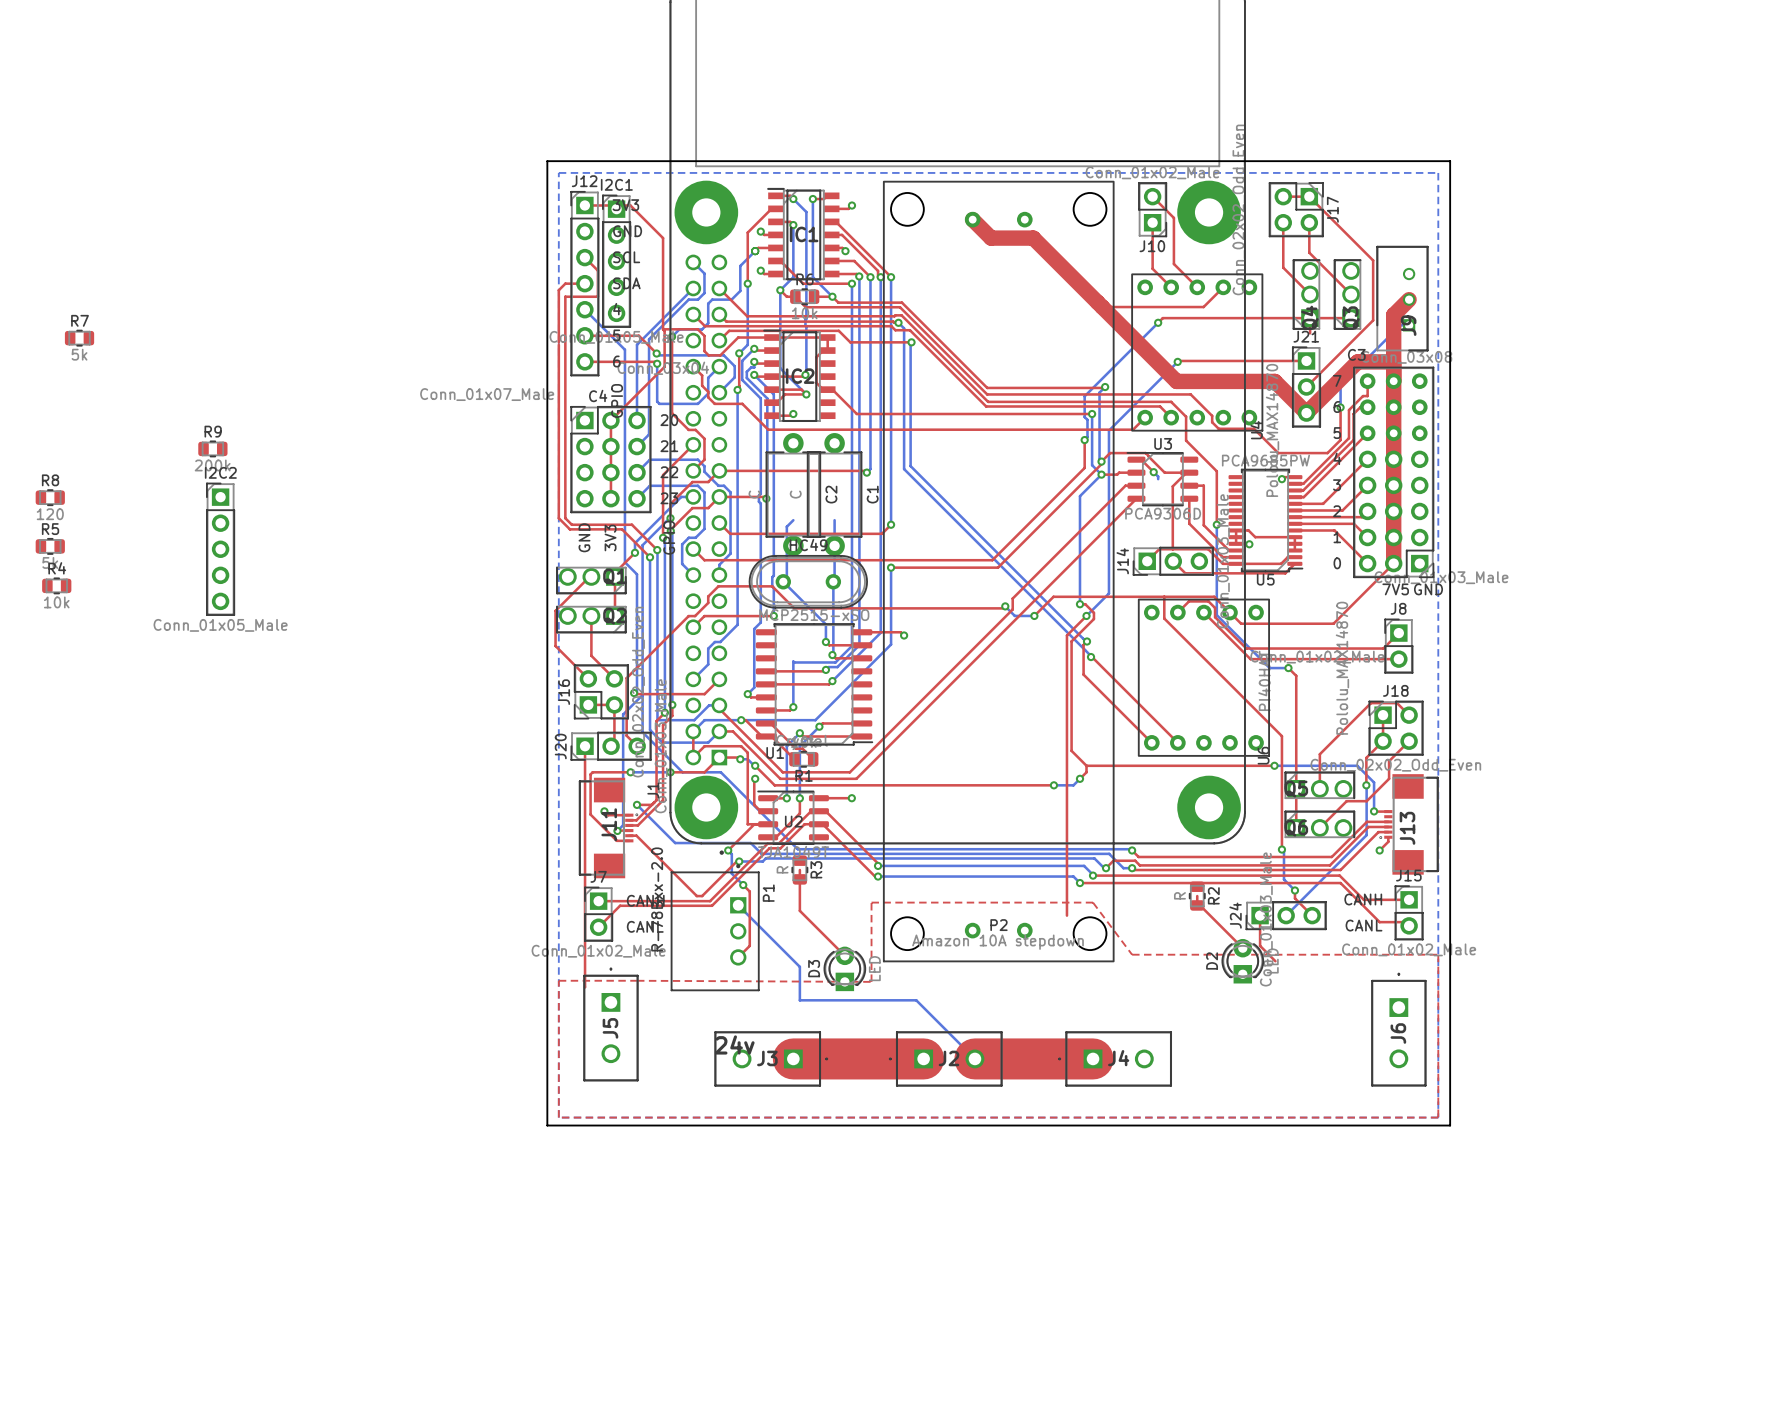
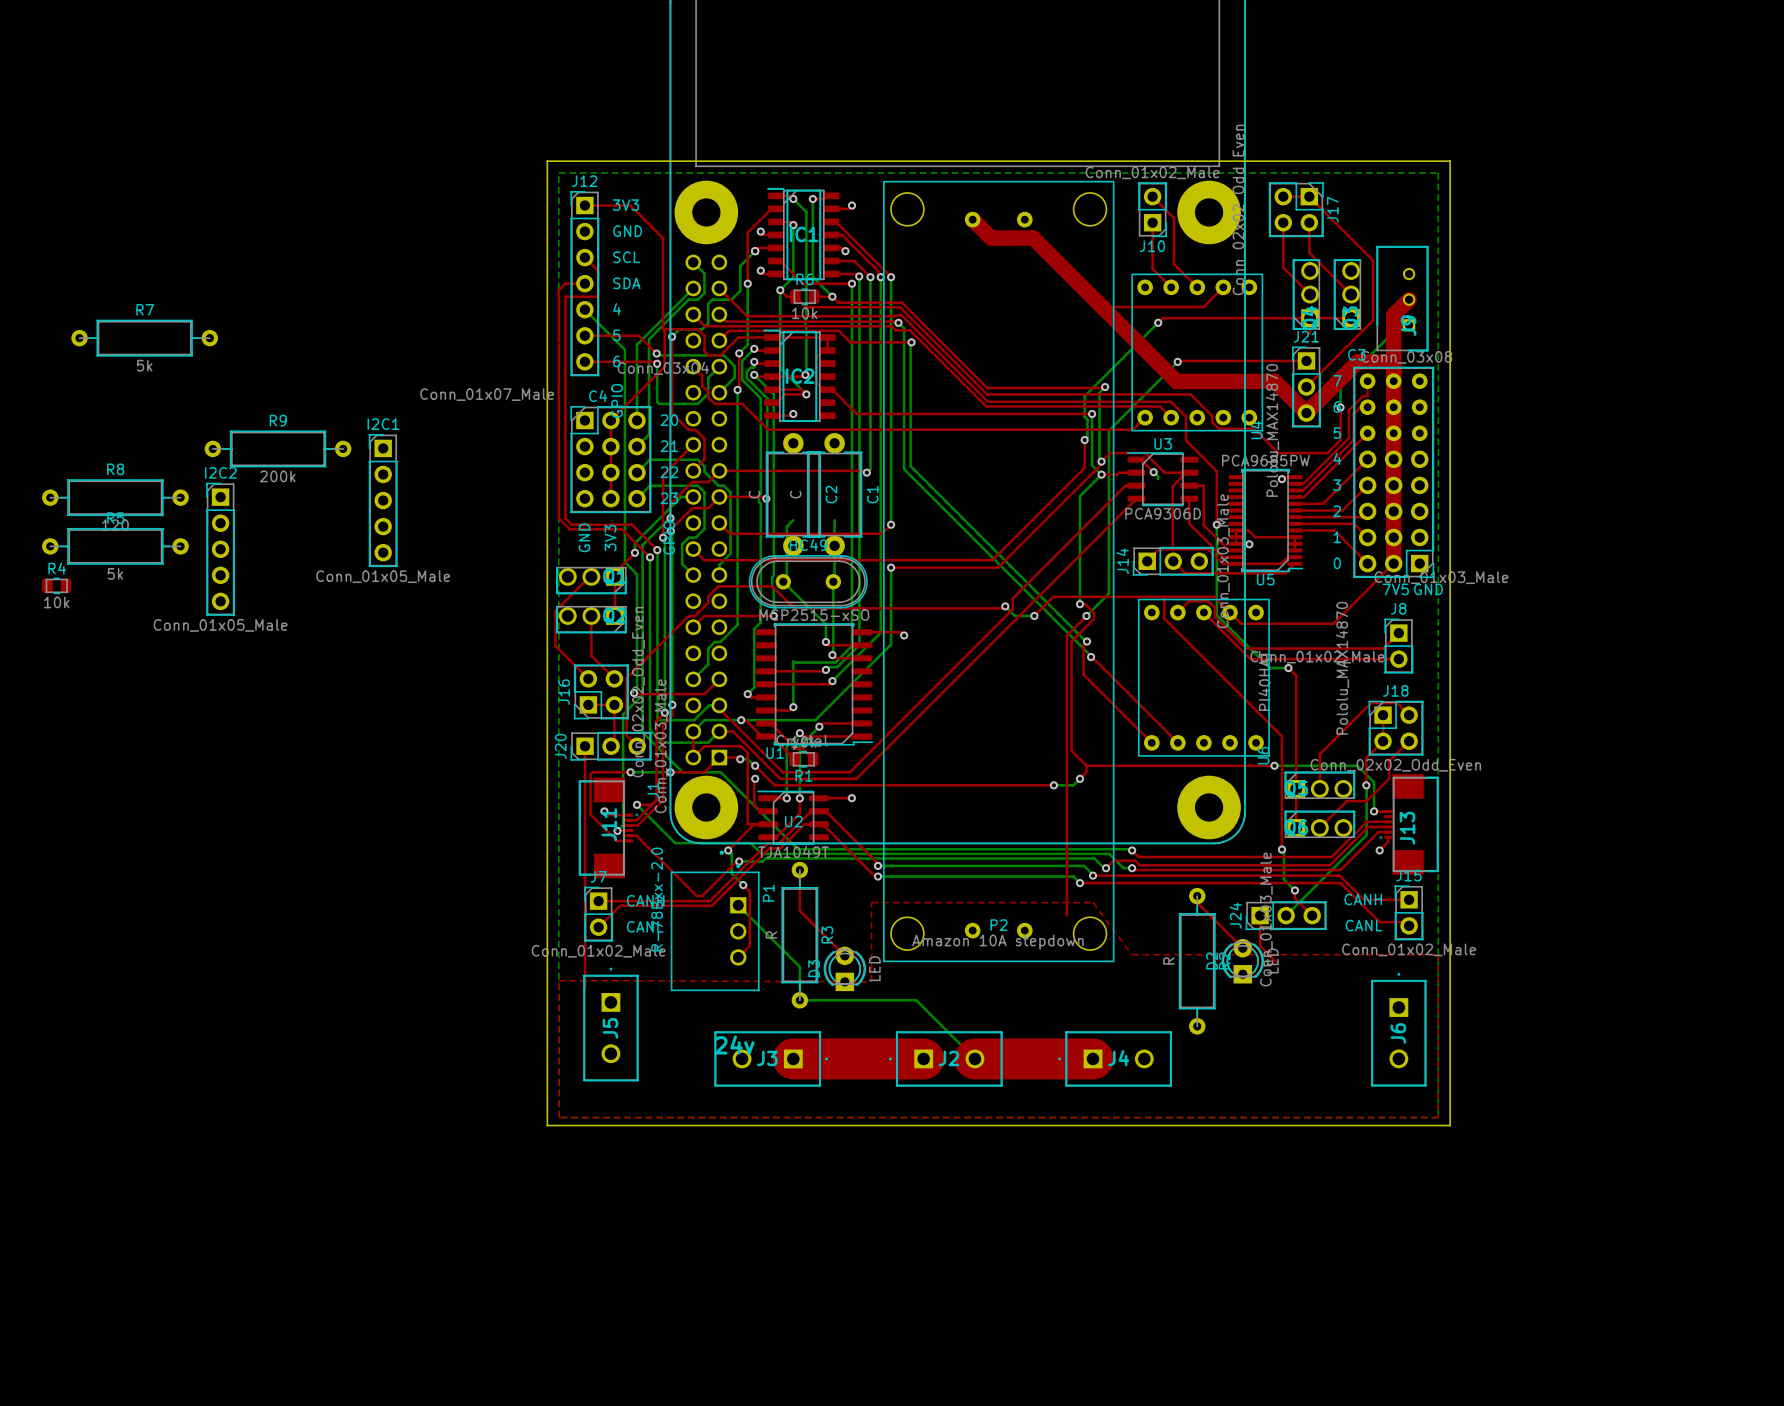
I2C1 position: (616, 261) -> (383, 500)
R7 footprint: [64, 329, 95, 347] -> [71, 319, 219, 357]
R9 footprint: [198, 440, 228, 458] -> [204, 430, 352, 468]
R8 footprint: [35, 489, 65, 506] -> [42, 479, 189, 516]
R5 footprint: [35, 538, 65, 555] -> [42, 528, 189, 565]
R3 footprint: [791, 855, 809, 885] -> [781, 861, 819, 1009]
R2 footprint: [1189, 881, 1206, 911] -> [1178, 887, 1216, 1035]

